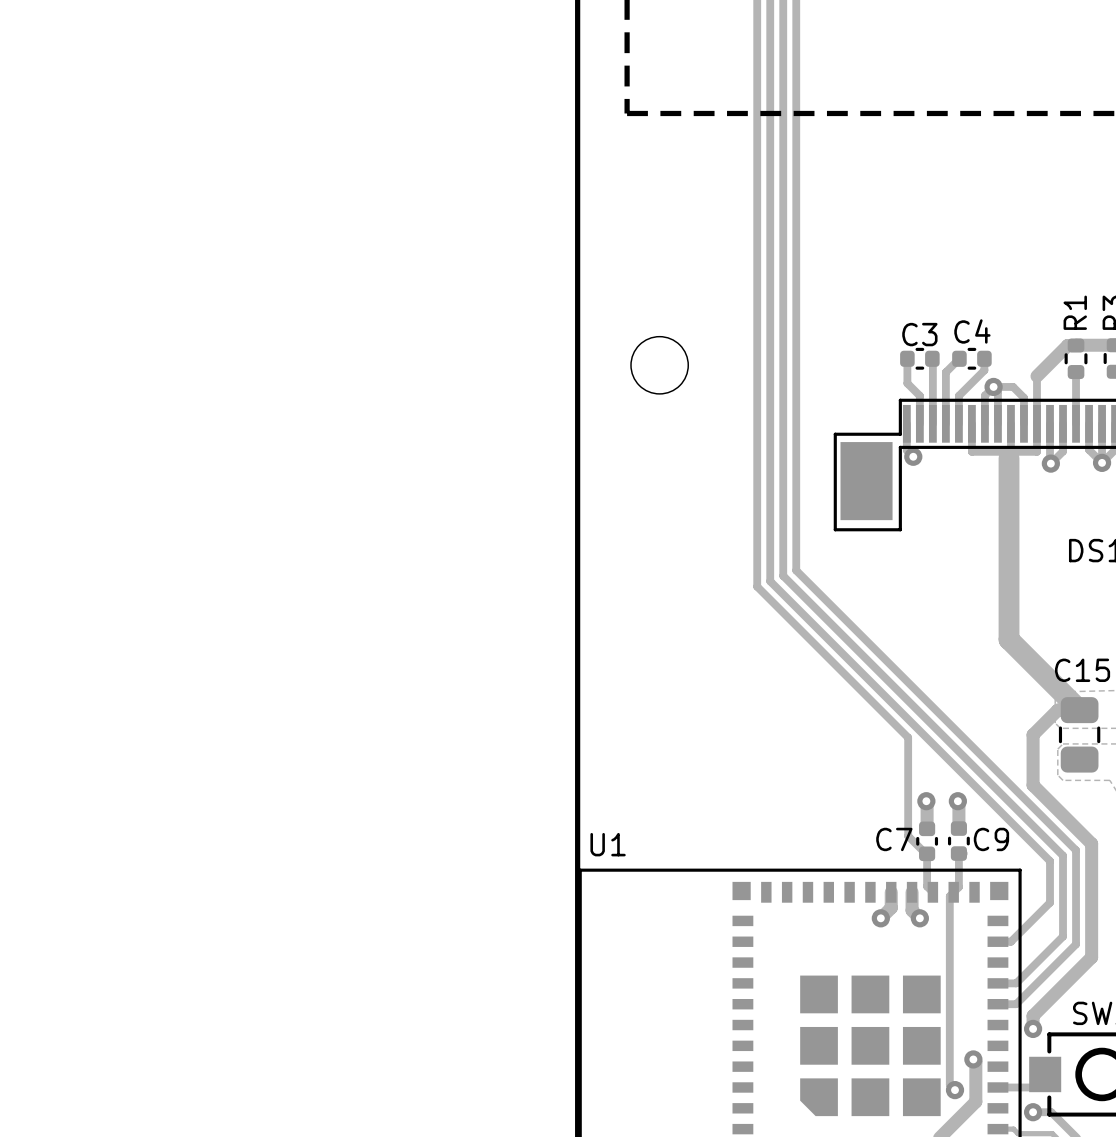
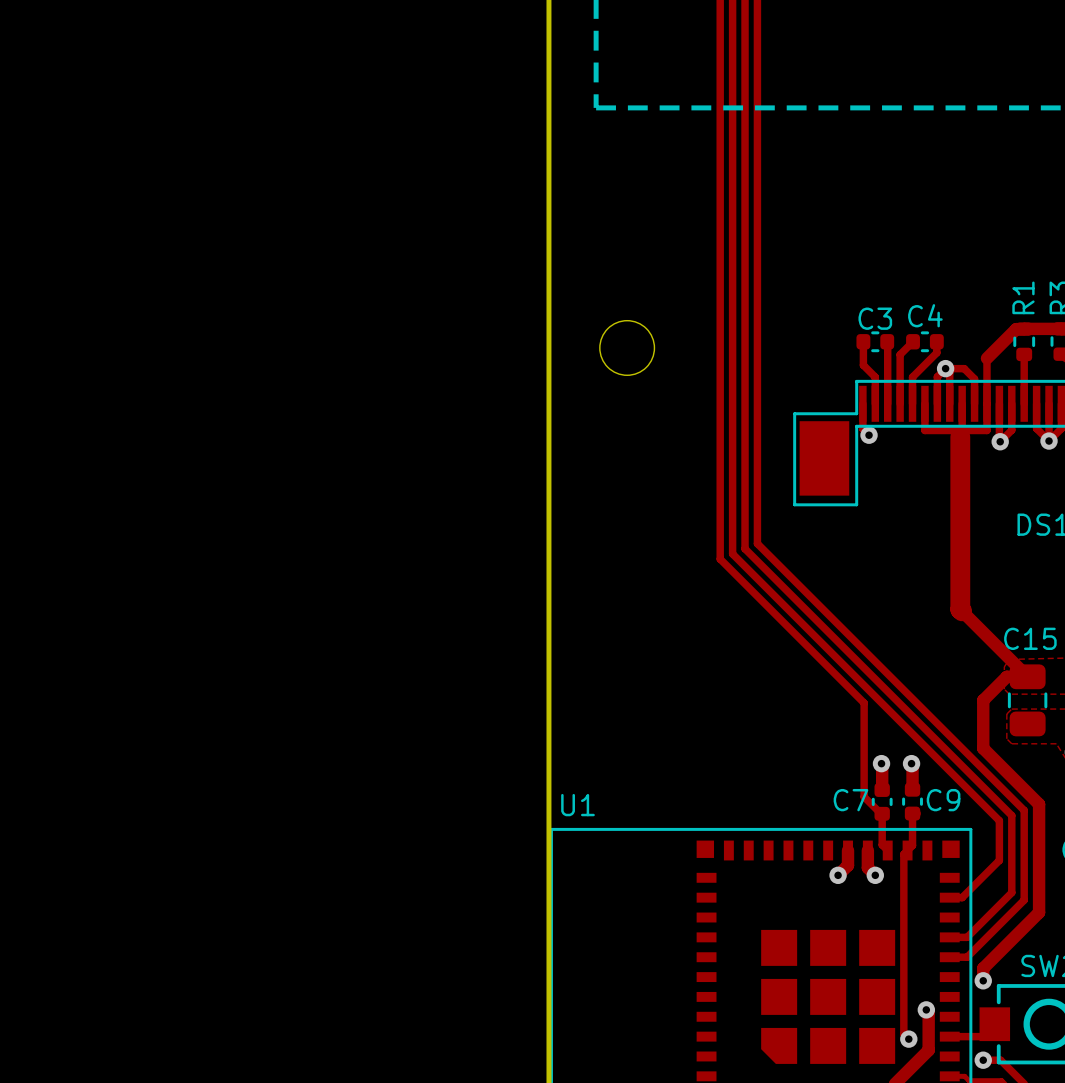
track width: thick (1010, 641) (1079, 710) -> thin (962, 611) (1027, 676)

